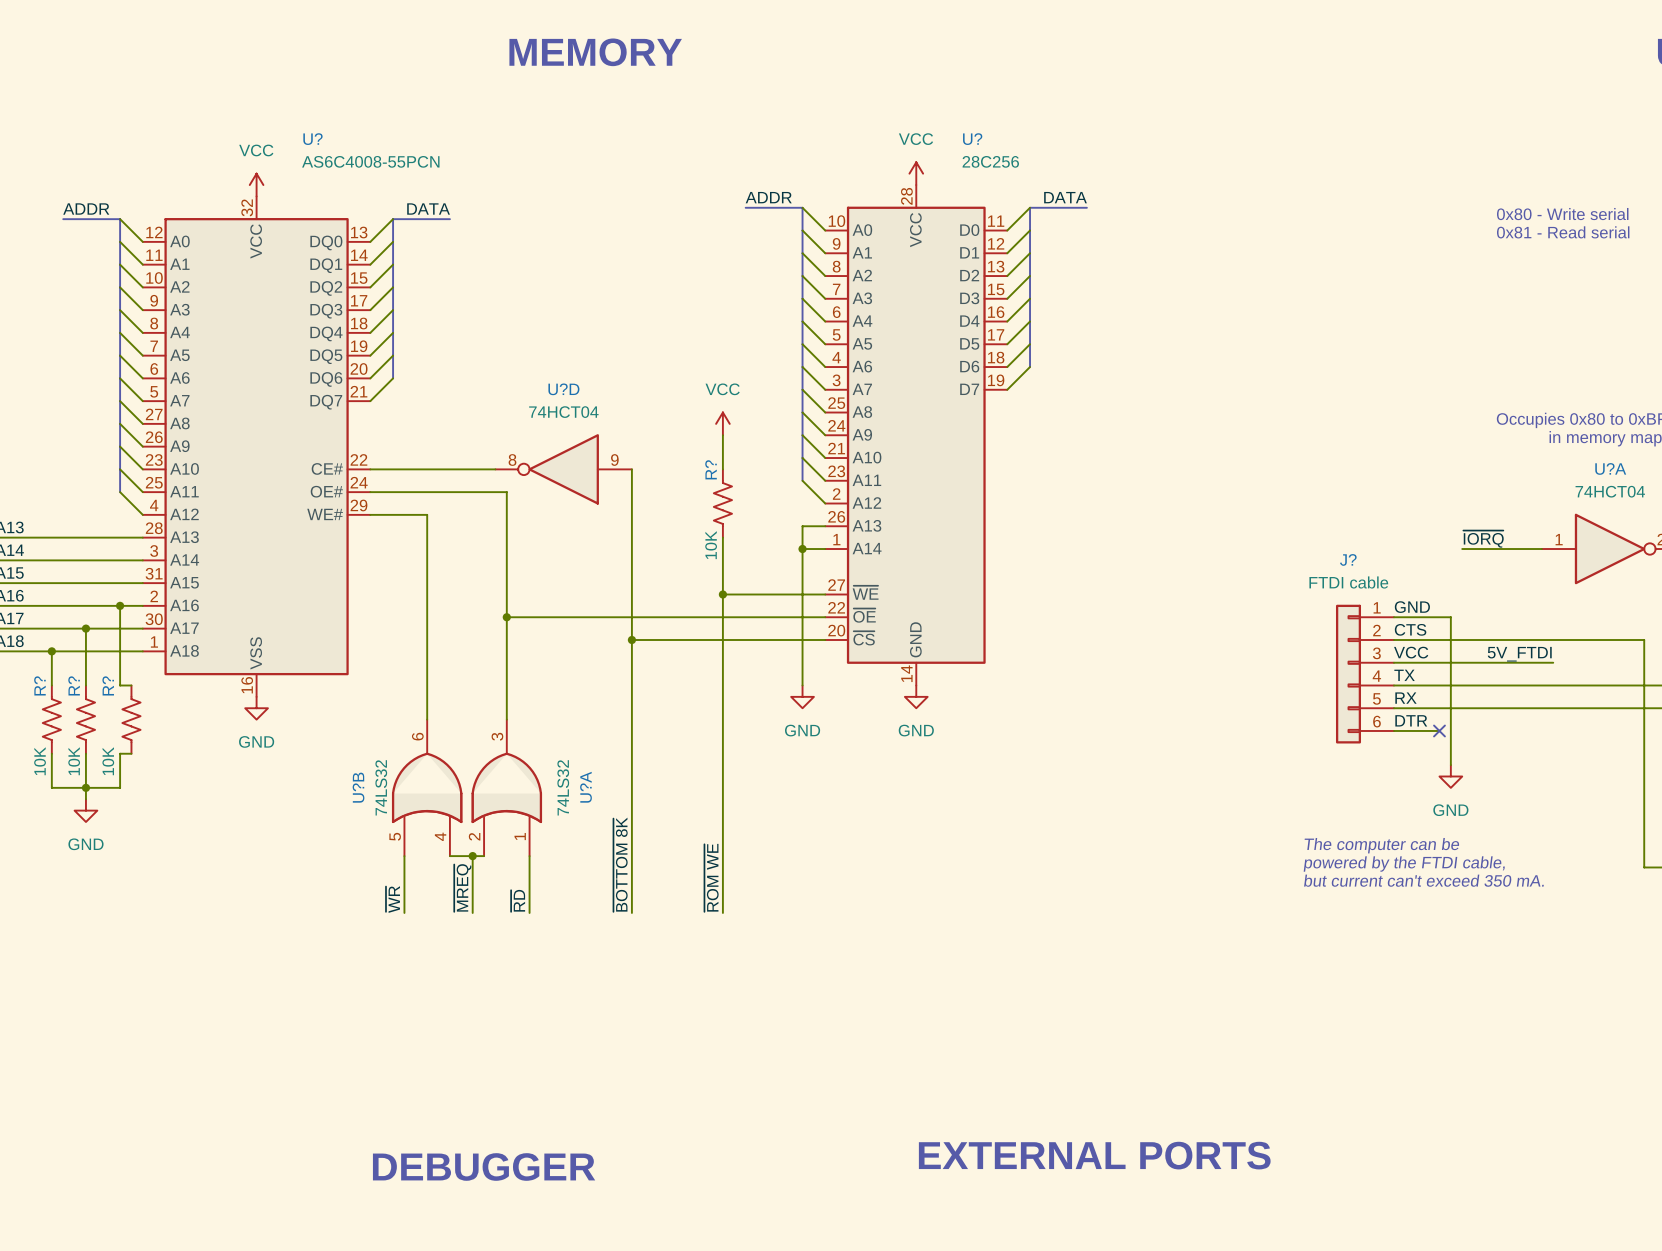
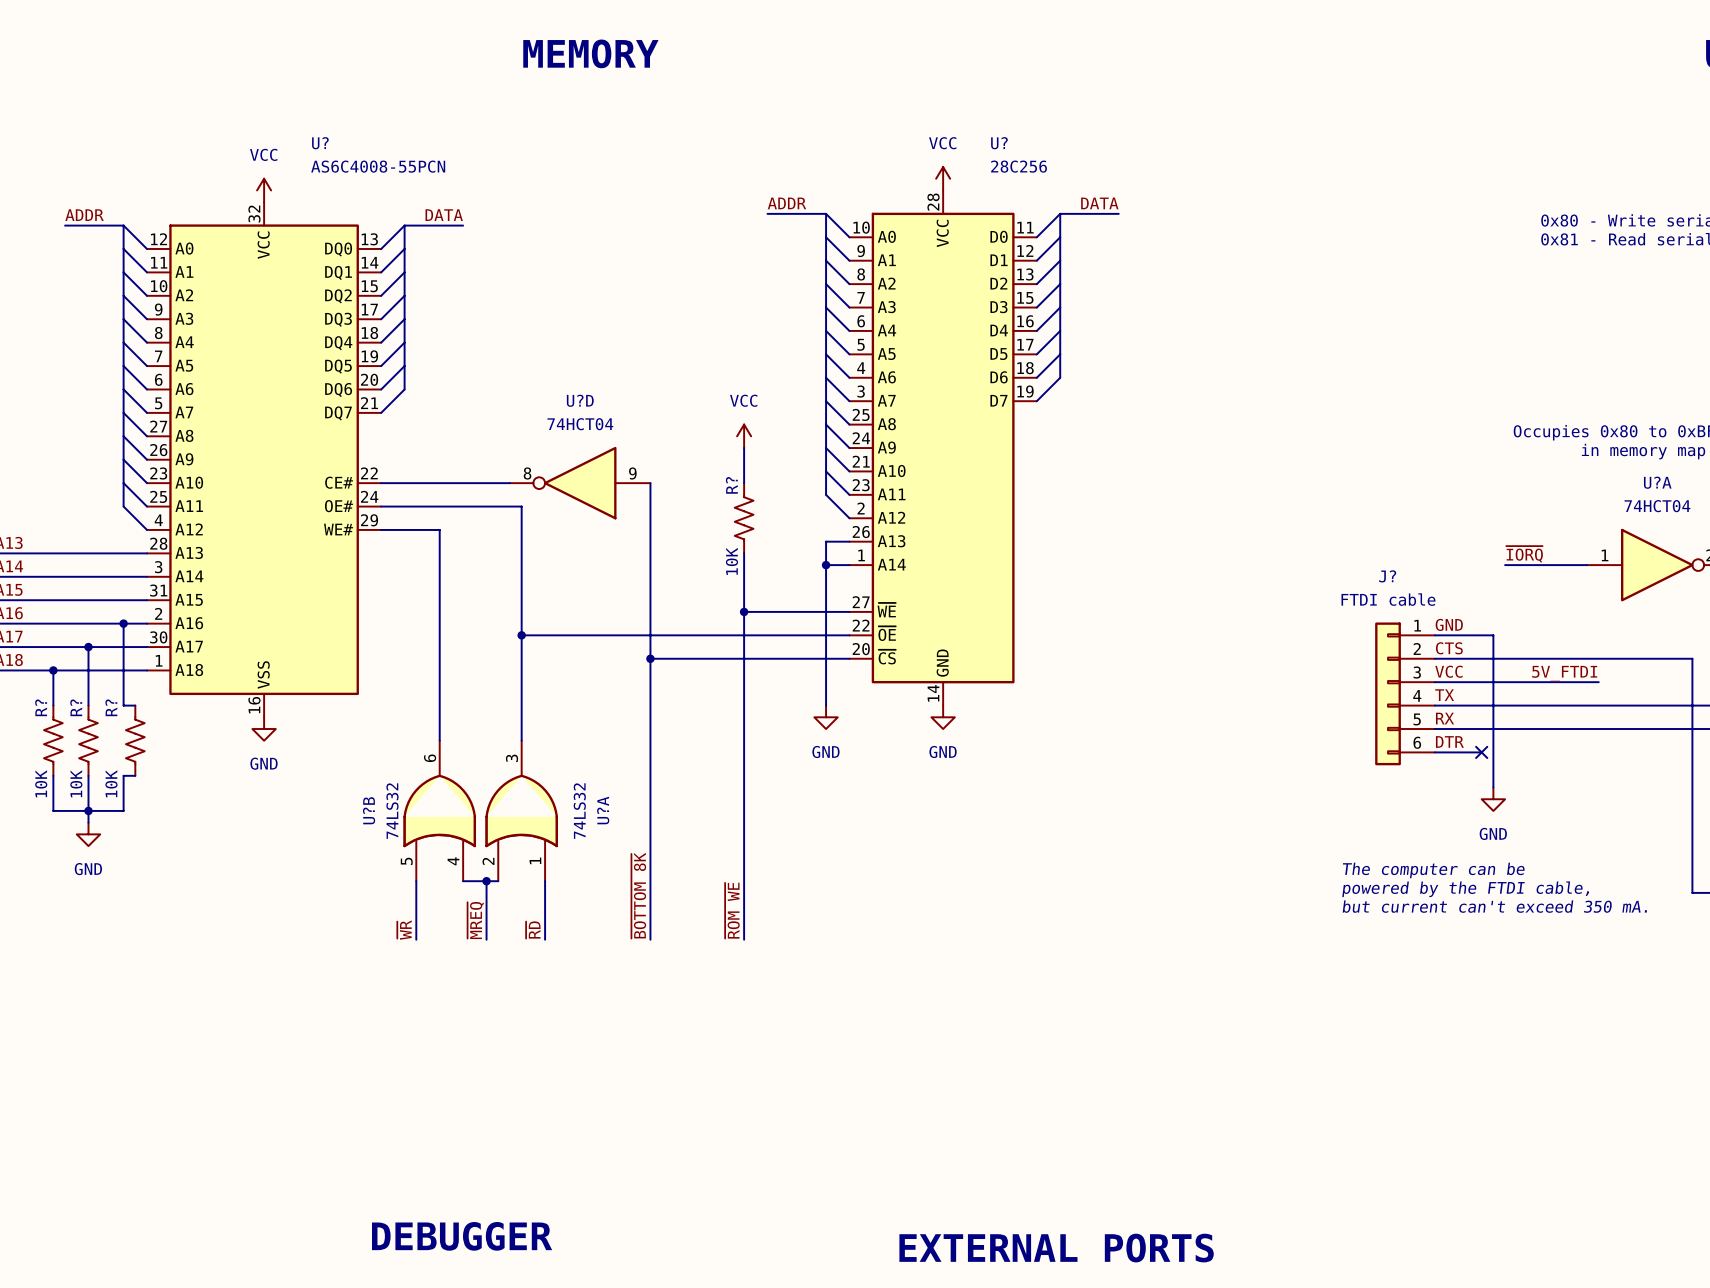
text position: EXTERNAL PORTS (1094, 1155) -> EXTERNAL PORTS (1056, 1248)
text position: DEBUGGER (484, 1166) -> DEBUGGER (462, 1236)

